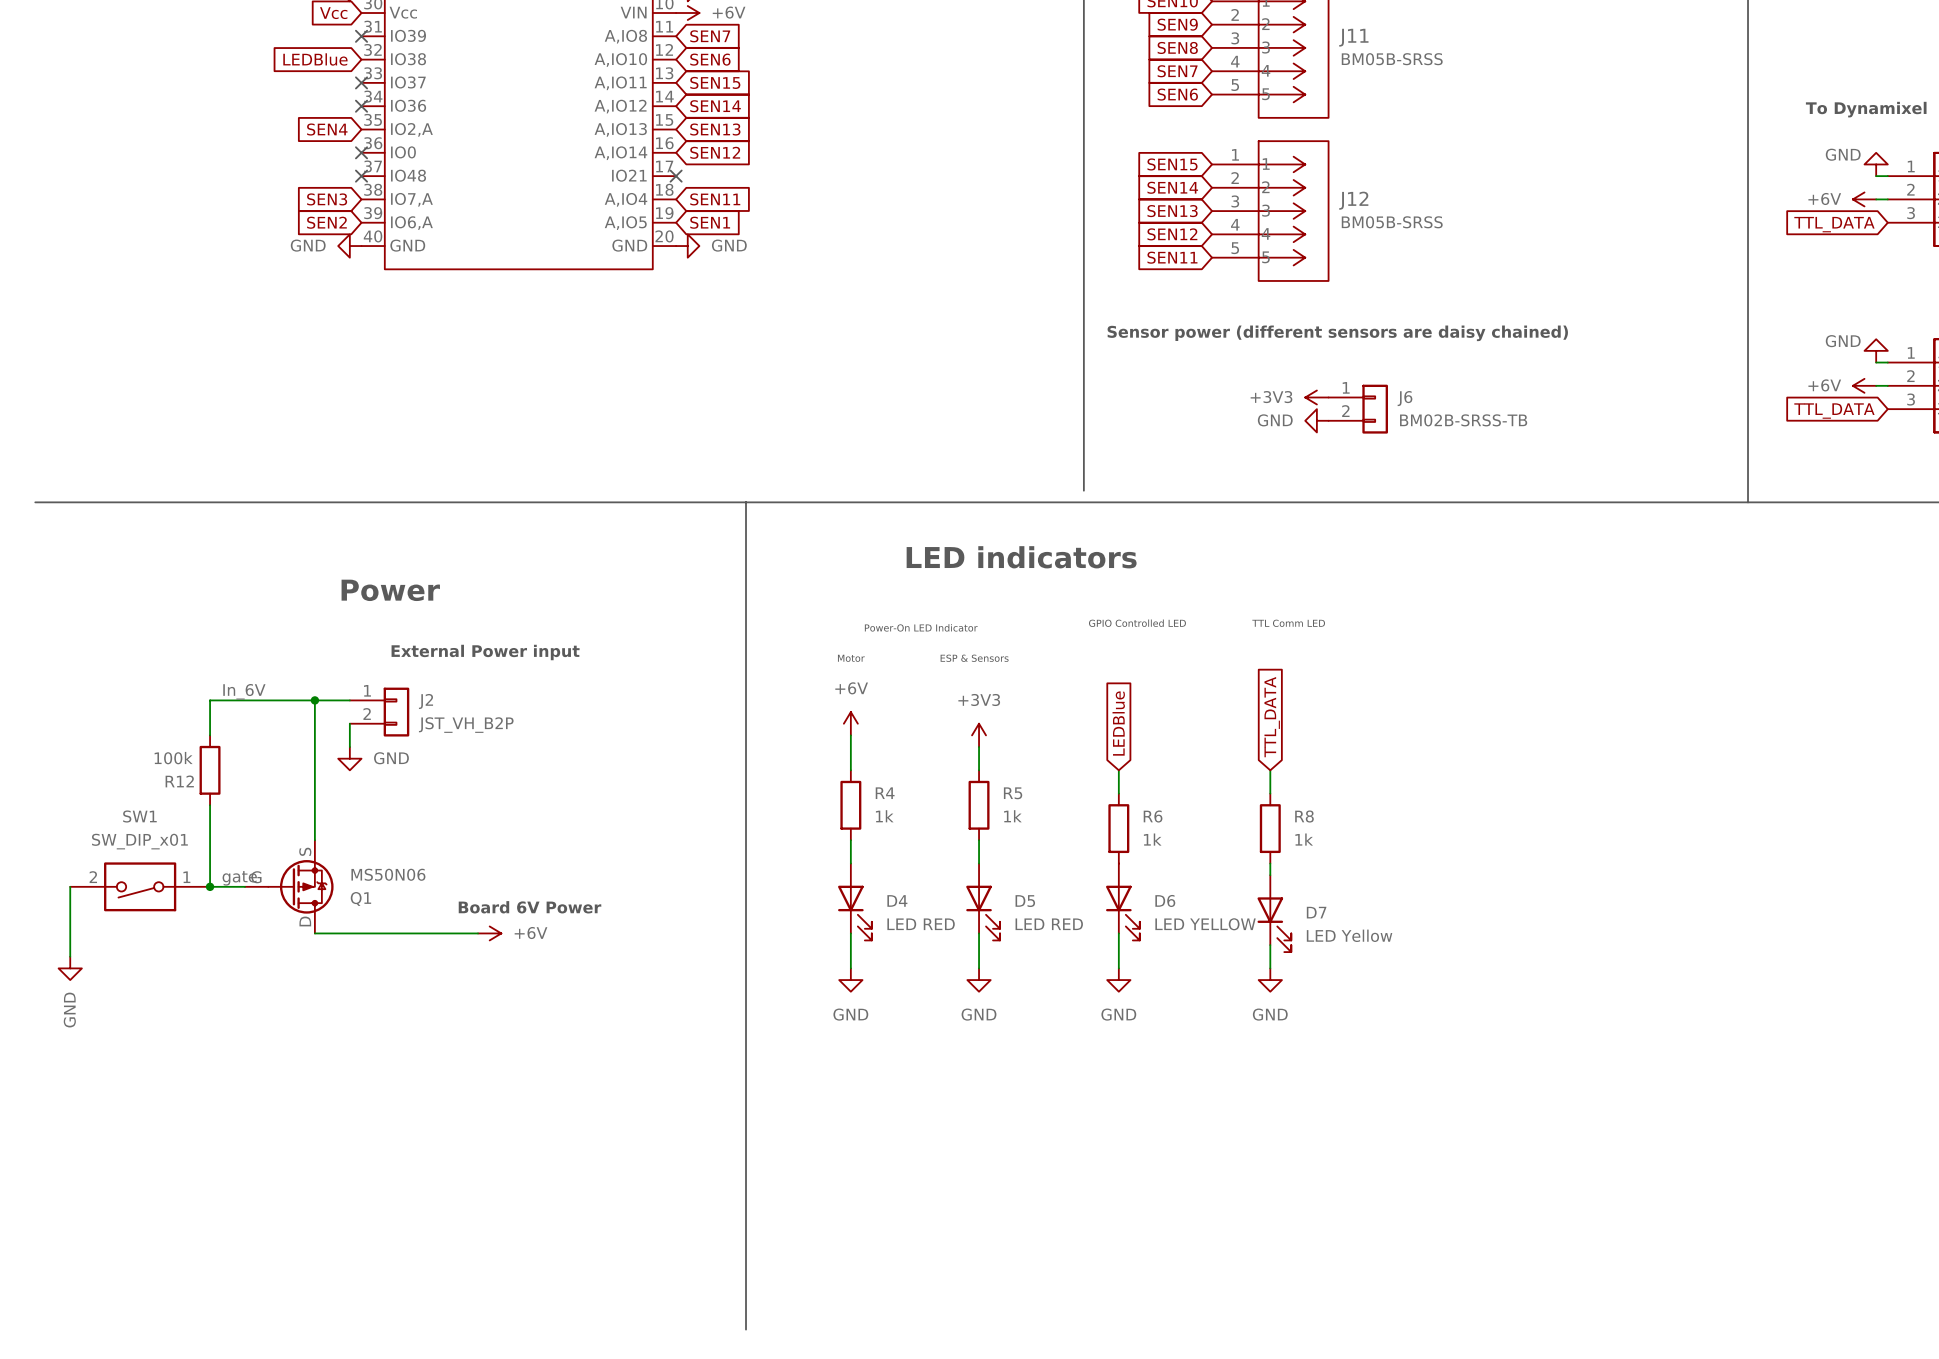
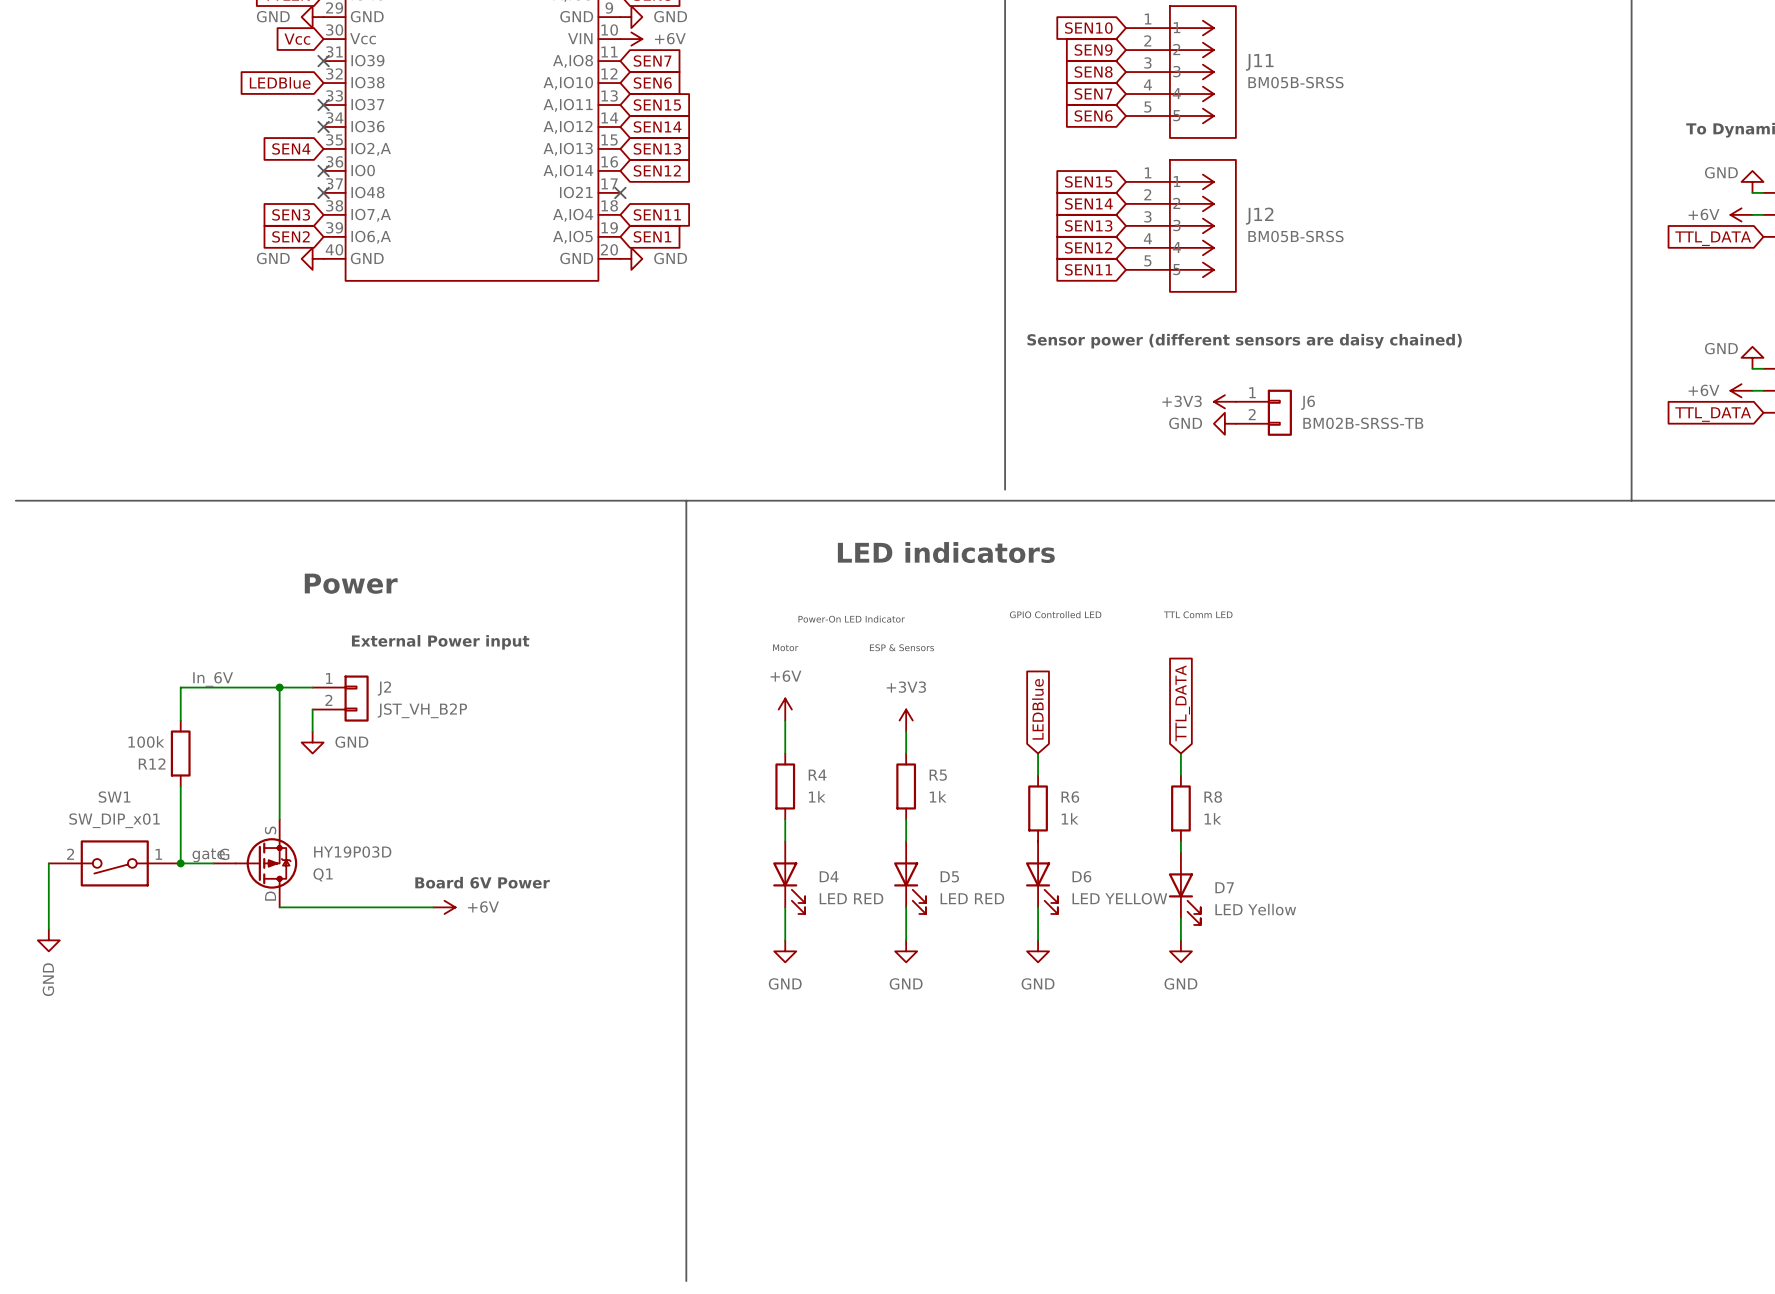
Q1 value: MS50N06 (388, 874) -> HY19P03D (352, 852)

